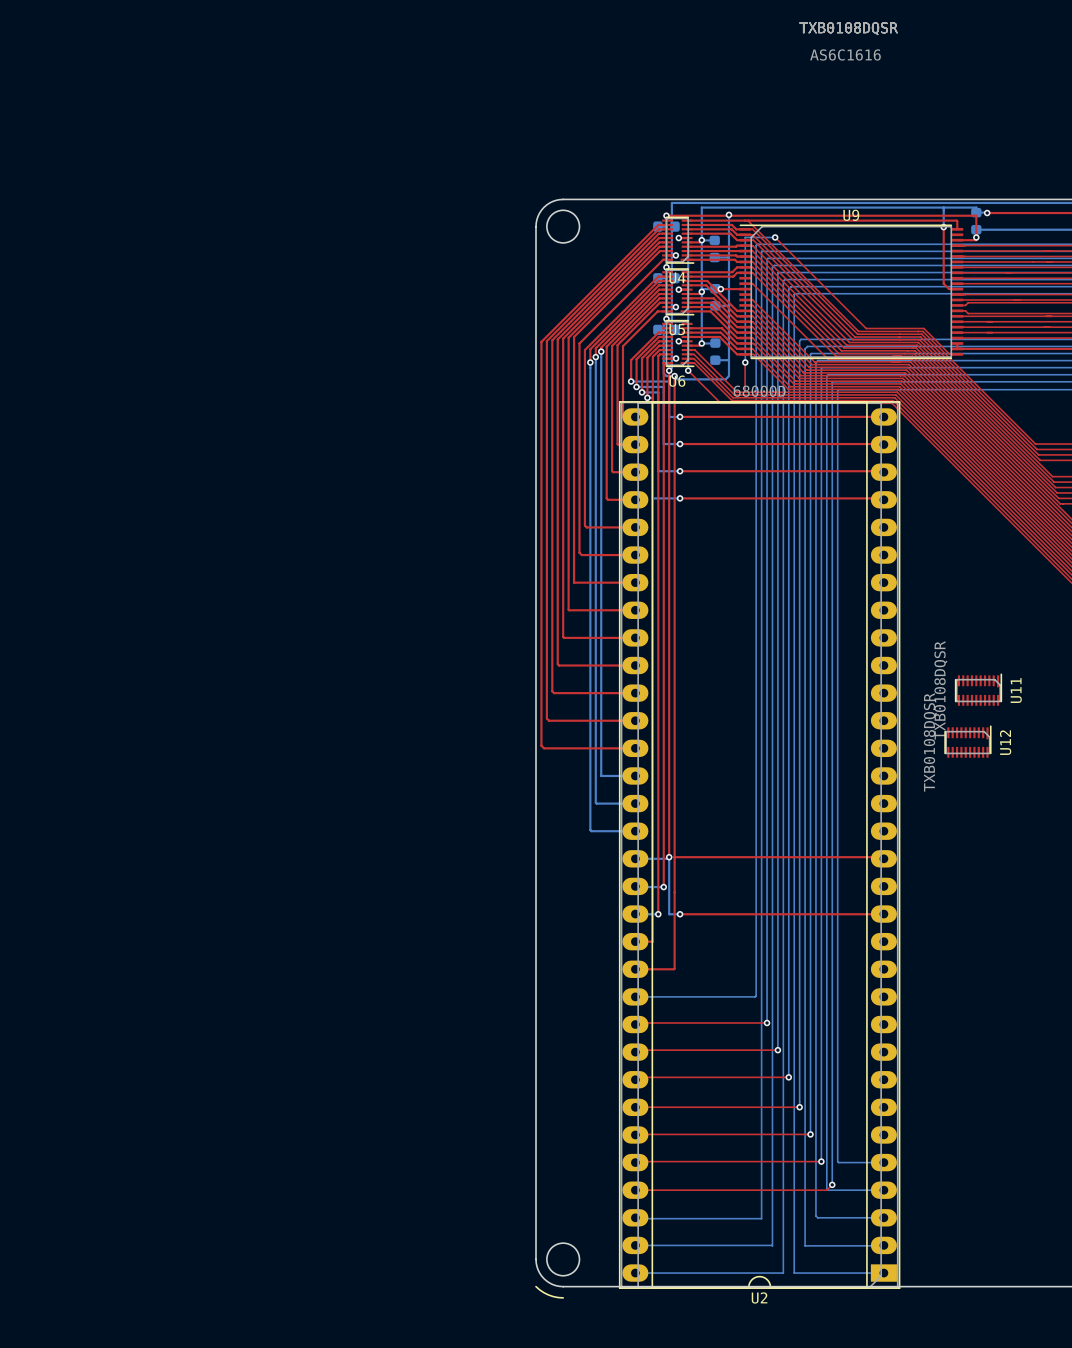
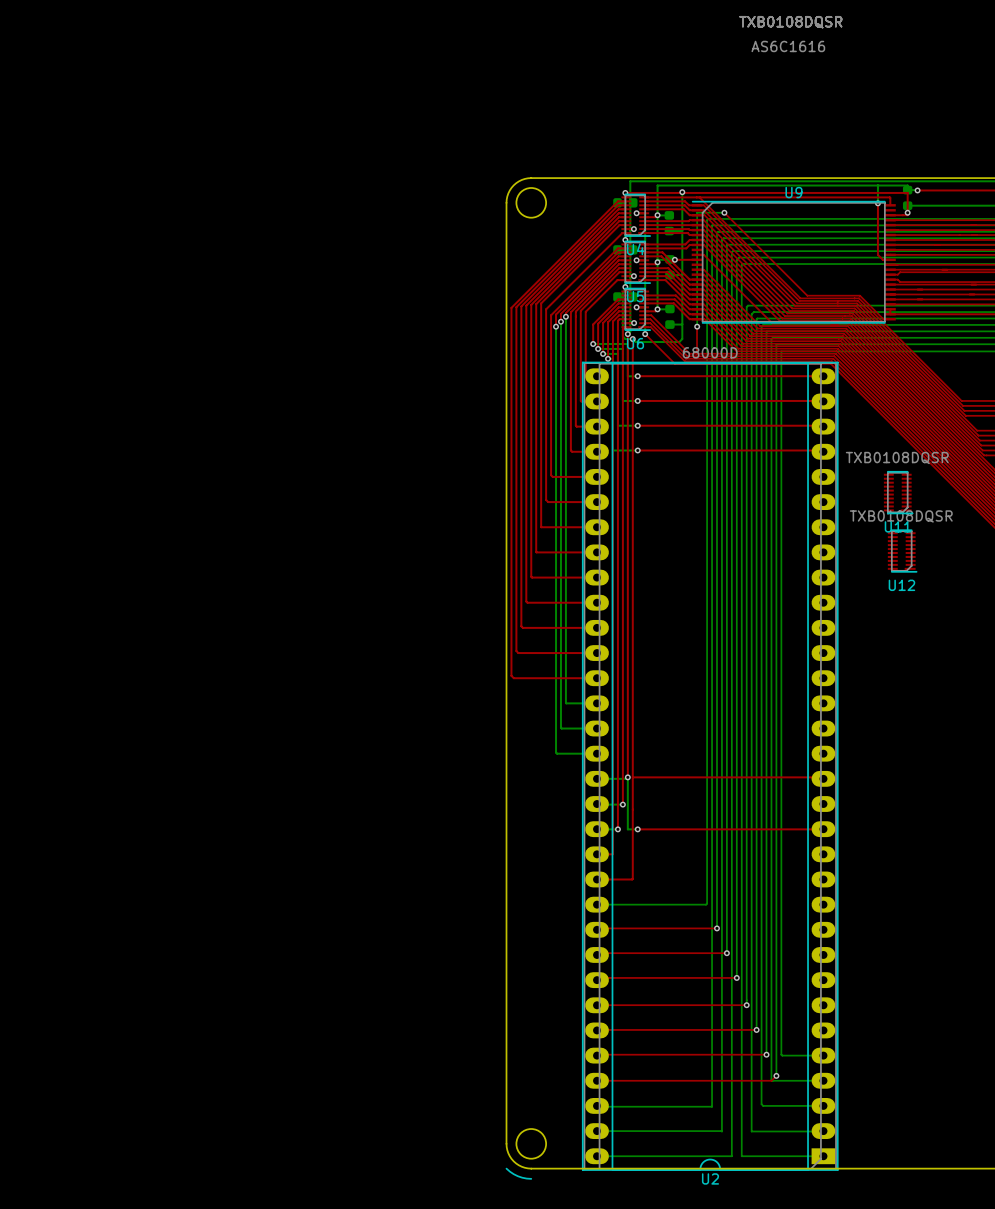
U11 rotation: 0° (978, 689) -> 90° clockwise (898, 492)
U11 position: (978, 689) -> (898, 492)
U12 rotation: 0° (967, 741) -> 90° clockwise (902, 551)
U12 position: (967, 741) -> (902, 551)

